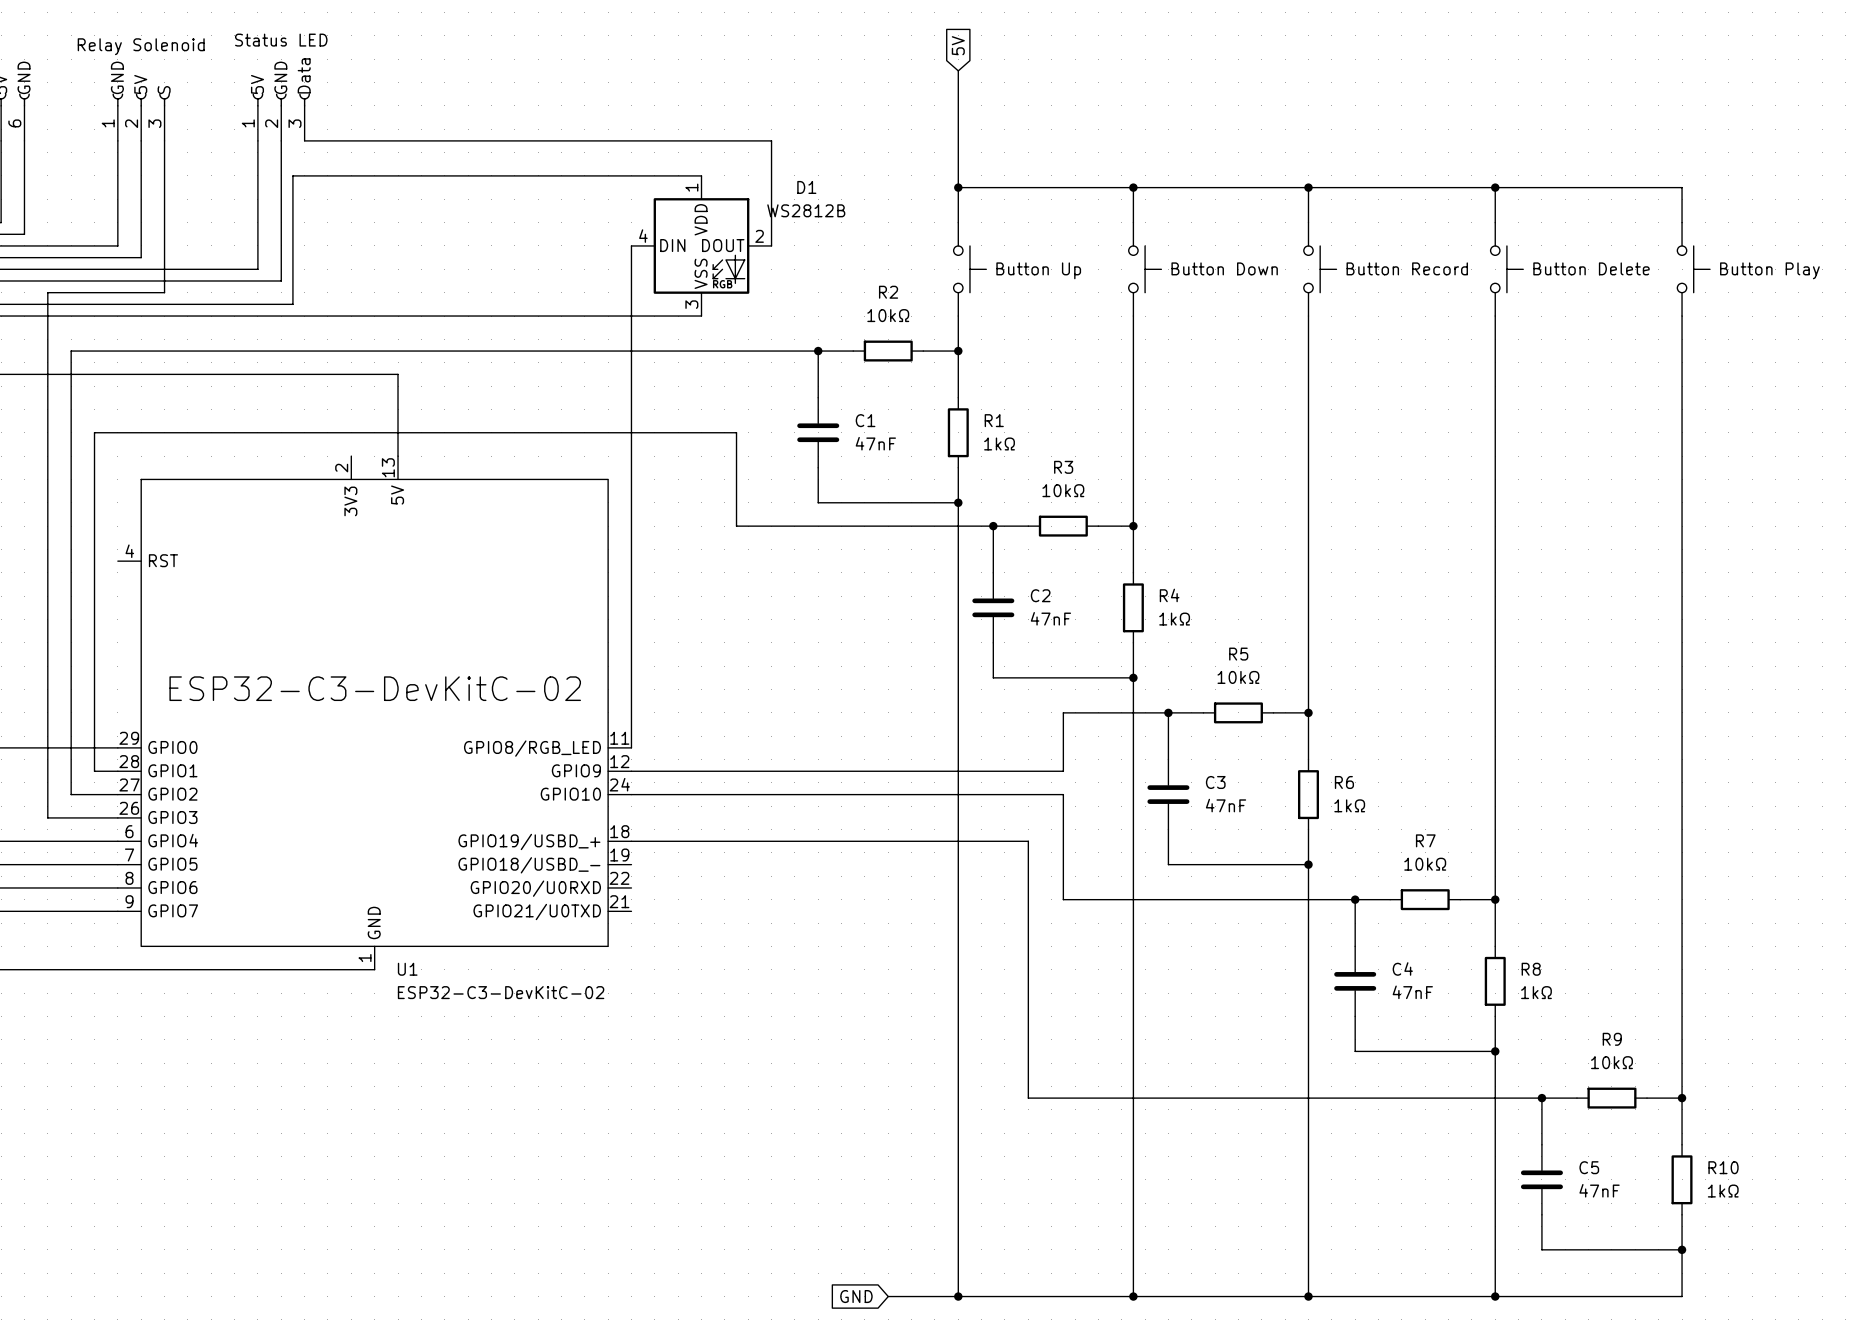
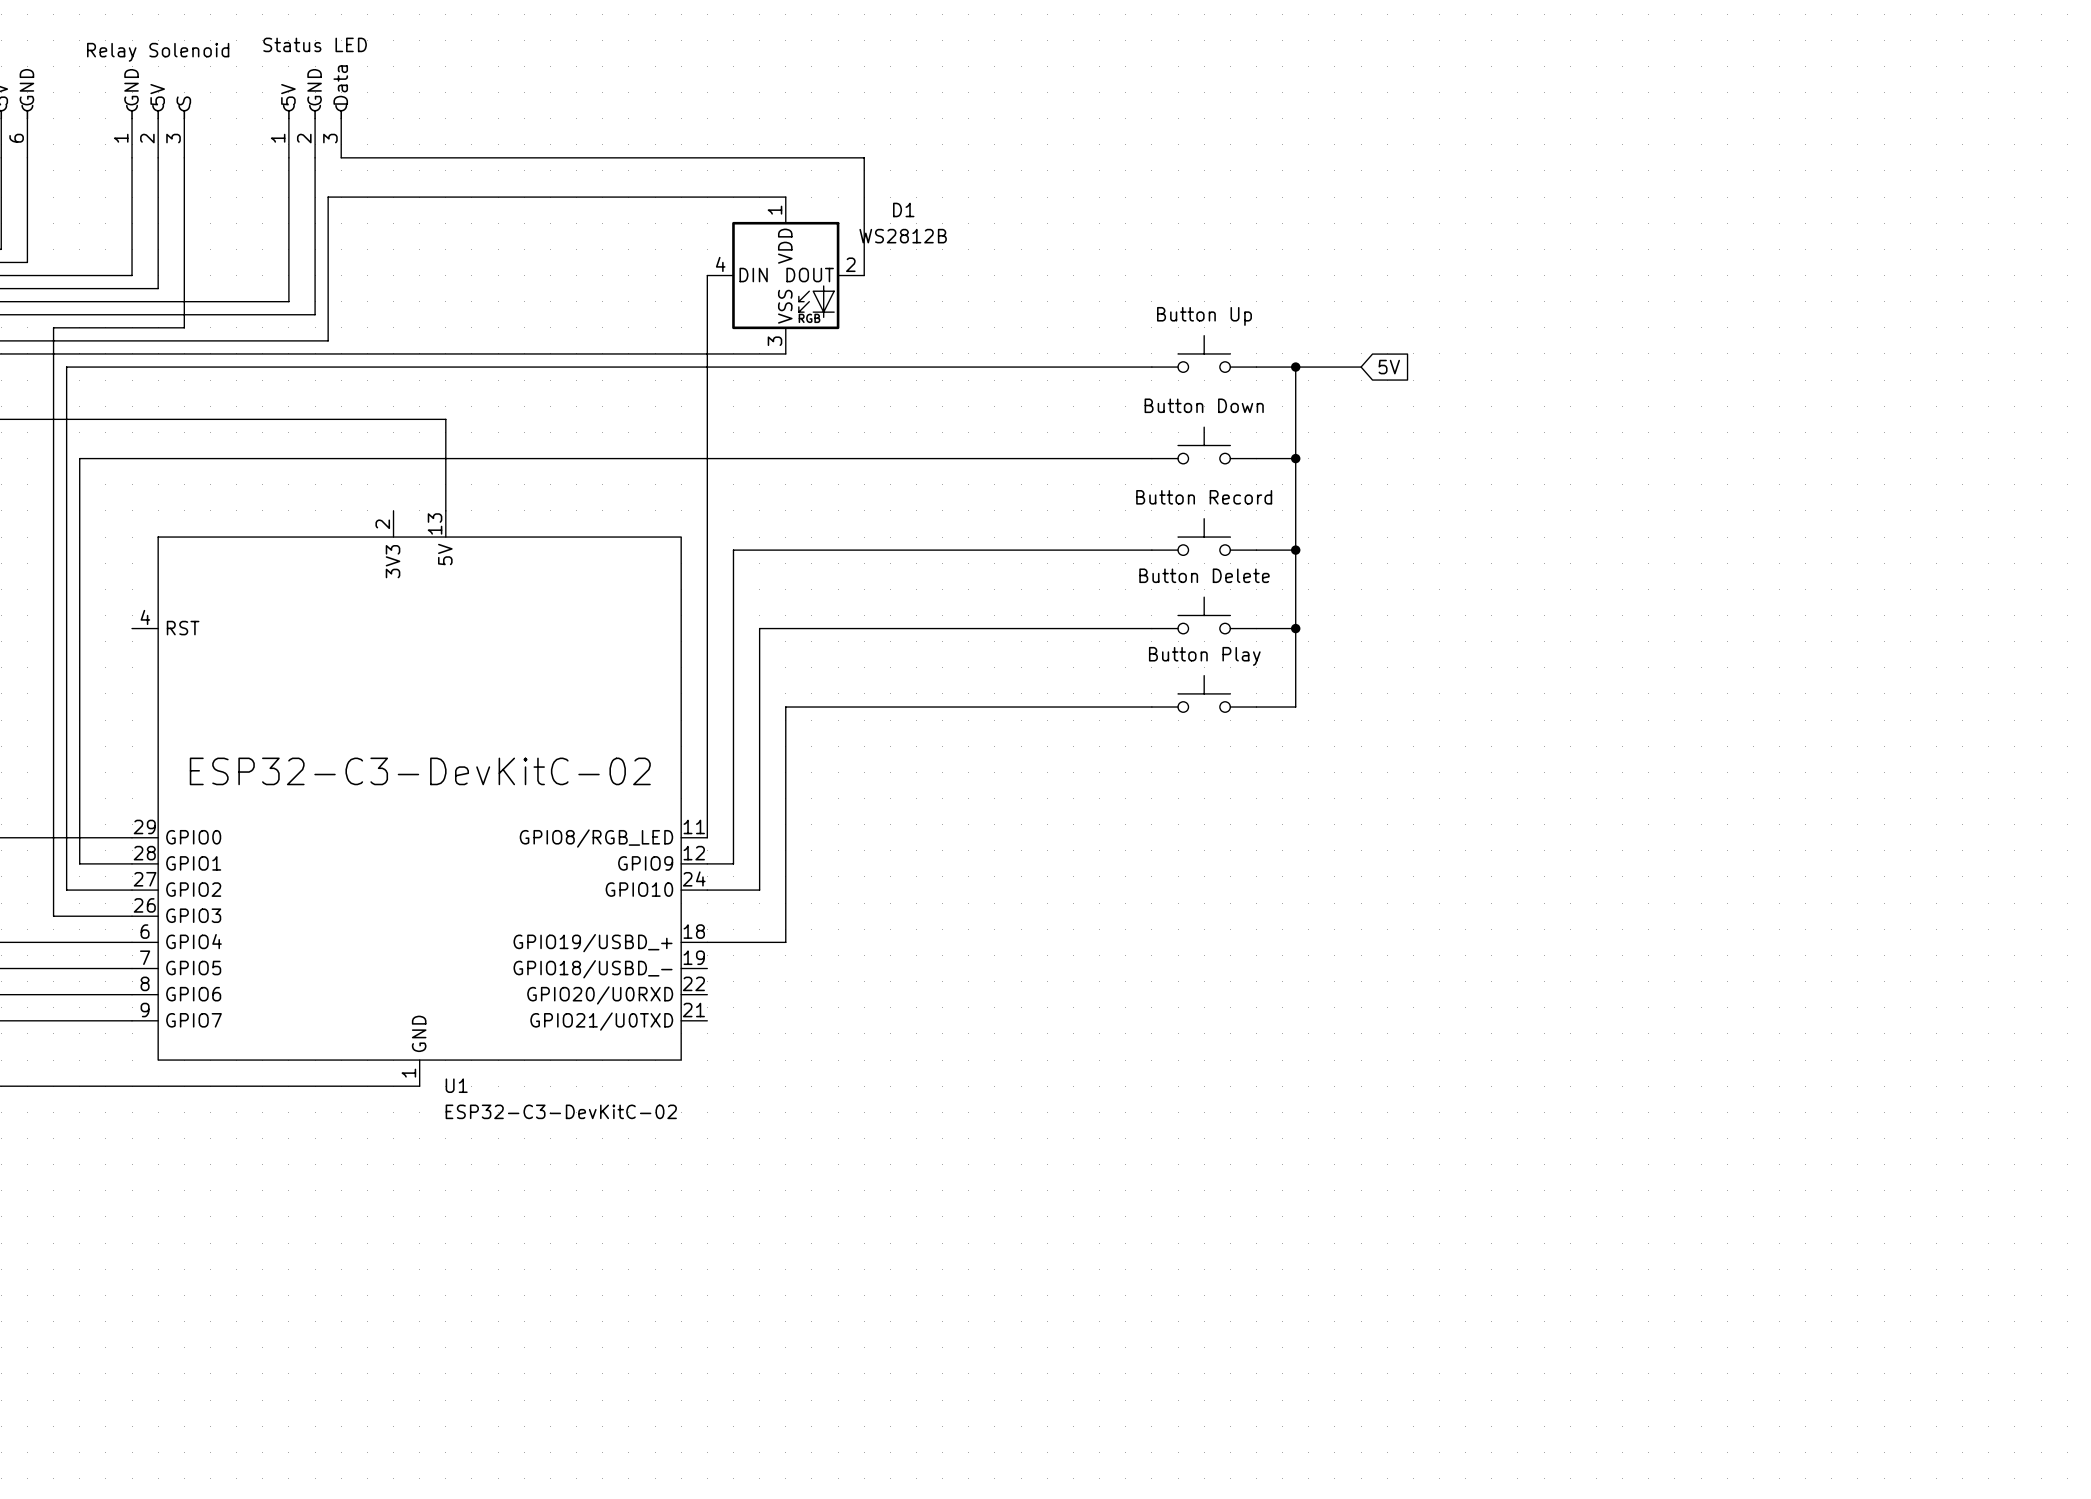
global label: 5V (958, 45) -> none
wire: (958, 70) (958, 222) -> none
wire: (958, 187) (1682, 187) (1682, 222) -> none
junction: (958, 187) -> none
wire: (1133, 187) (1133, 222) -> none
junction: (1133, 187) -> none
wire: (1308, 187) (1308, 222) -> none
junction: (1308, 187) -> none
wire: (1495, 187) (1495, 222) -> none
junction: (1495, 187) -> none
part value position: Button Down (1224, 268) -> Button Down (1204, 405)
part rotation: 0° (969, 269) -> 90° counterclockwise (1204, 353)
part position: (969, 269) -> (1204, 353)
part rotation: 0° (1145, 269) -> 90° counterclockwise (1204, 445)
part position: (1145, 269) -> (1204, 445)
part: Button Record (1320, 269) -> none
part: Button Delete (1506, 269) -> none
part: Button Play (1693, 269) -> none
part value position: Button Up (1038, 270) -> Button Up (1204, 316)
wire: (958, 316) (958, 397) -> none
wire: (1133, 316) (1133, 572) -> none
wire: (1308, 316) (1308, 759) -> none
wire: (1495, 316) (1495, 946) -> none
wire: (1682, 316) (1682, 1144) -> none
wire: none -> (1151, 367) (66, 367) (66, 890) (79, 890)
wire: none -> (1256, 367) (1361, 367)
wire: none -> (1295, 367) (1295, 707) (1256, 707)
junction: none -> (1295, 367)
global label: none -> 5V (1389, 367)
wire: (818, 351) (818, 397) -> none
junction: (818, 351) -> none
wire: (853, 351) (71, 351) (71, 409) -> (1151, 458) (79, 458)
R2: 10kΩ (888, 351) -> none
wire: (923, 351) (958, 351) -> (1256, 458) (1295, 458)
junction: (958, 351) -> none
junction: none -> (1295, 458)
C1: 47nF (818, 432) -> none
R1: 1kΩ (958, 432) -> none
wire: (818, 467) (818, 502) (958, 502) -> none
wire: (958, 467) (958, 1296) -> none
part: none -> Button Record (1204, 537)
junction: none -> (1295, 550)
junction: (958, 502) -> none
wire: (993, 526) (993, 572) -> none
junction: (993, 526) -> none
wire: (1028, 526) (736, 526) (736, 432) (94, 432) (94, 771) -> none
R3: 10kΩ (1063, 526) -> none
wire: (1098, 526) (1133, 526) -> (1256, 550) (1295, 550)
junction: (1133, 526) -> none
part: none -> Button Delete (1204, 615)
junction: none -> (1295, 628)
C2: 47nF (993, 607) -> none
R4: 1kΩ (1133, 607) -> none
part: none -> Button Play (1204, 693)
wire: (993, 642) (993, 677) (1133, 677) -> none
wire: (1133, 642) (1133, 1296) -> none
junction: (1133, 677) -> none
wire: (1168, 712) (1168, 759) -> none
junction: (1168, 712) -> none
wire: (1203, 712) (1063, 712) (1063, 771) (654, 771) -> (1151, 550) (733, 550) (733, 863)
R5: 10kΩ (1238, 712) -> none
wire: (1273, 712) (1308, 712) -> (1256, 628) (1295, 628)
junction: (1308, 712) -> none
wire: (71, 771) (71, 794) -> (79, 863) (105, 863)
wire: (678, 794) (1063, 794) (1063, 899) (1390, 899) -> (759, 890) (759, 628) (1151, 628)
C3: 47nF (1168, 794) -> none
R6: 1kΩ (1308, 794) -> none
wire: (1168, 829) (1168, 864) (1308, 864) -> none
wire: (1308, 829) (1308, 1296) -> none
wire: (701, 841) (1028, 841) (1028, 1098) (1576, 1098) -> (785, 942) (785, 707) (1151, 707)
junction: (1308, 864) -> none
wire: (1355, 899) (1355, 946) -> none
junction: (1355, 899) -> none
R7: 10kΩ (1425, 899) -> none
wire: (1460, 899) (1495, 899) -> none
junction: (1495, 899) -> none
C4: 47nF (1355, 981) -> none
R8: 1kΩ (1495, 981) -> none
wire: (1355, 1016) (1355, 1051) (1495, 1051) -> none
wire: (1495, 1016) (1495, 1296) -> none
junction: (1495, 1051) -> none
wire: (1541, 1098) (1541, 1144) -> none
junction: (1541, 1098) -> none
R9: 10kΩ (1611, 1098) -> none
wire: (1647, 1098) (1682, 1098) -> none
junction: (1682, 1098) -> none
C5: 47nF (1541, 1179) -> none
R10: 1kΩ (1682, 1179) -> none
wire: (1541, 1214) (1541, 1249) (1682, 1249) -> none
wire: (1682, 1214) (1682, 1296) (888, 1296) -> none
junction: (1682, 1249) -> none
global label: GND (856, 1296) -> none
junction: (958, 1296) -> none
junction: (1133, 1296) -> none
junction: (1308, 1296) -> none
junction: (1495, 1296) -> none

